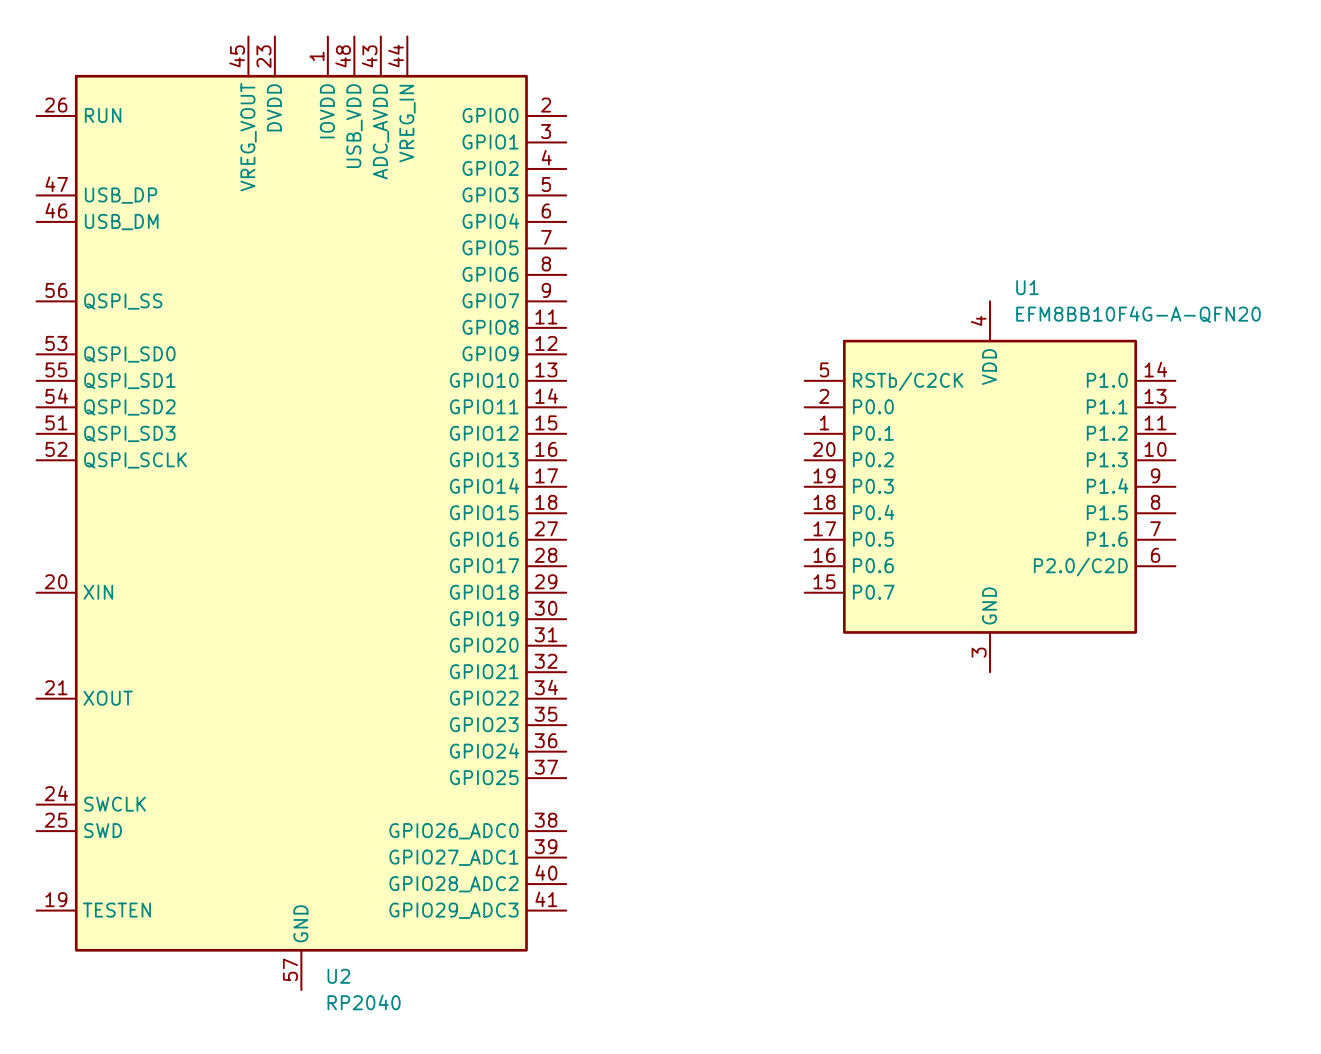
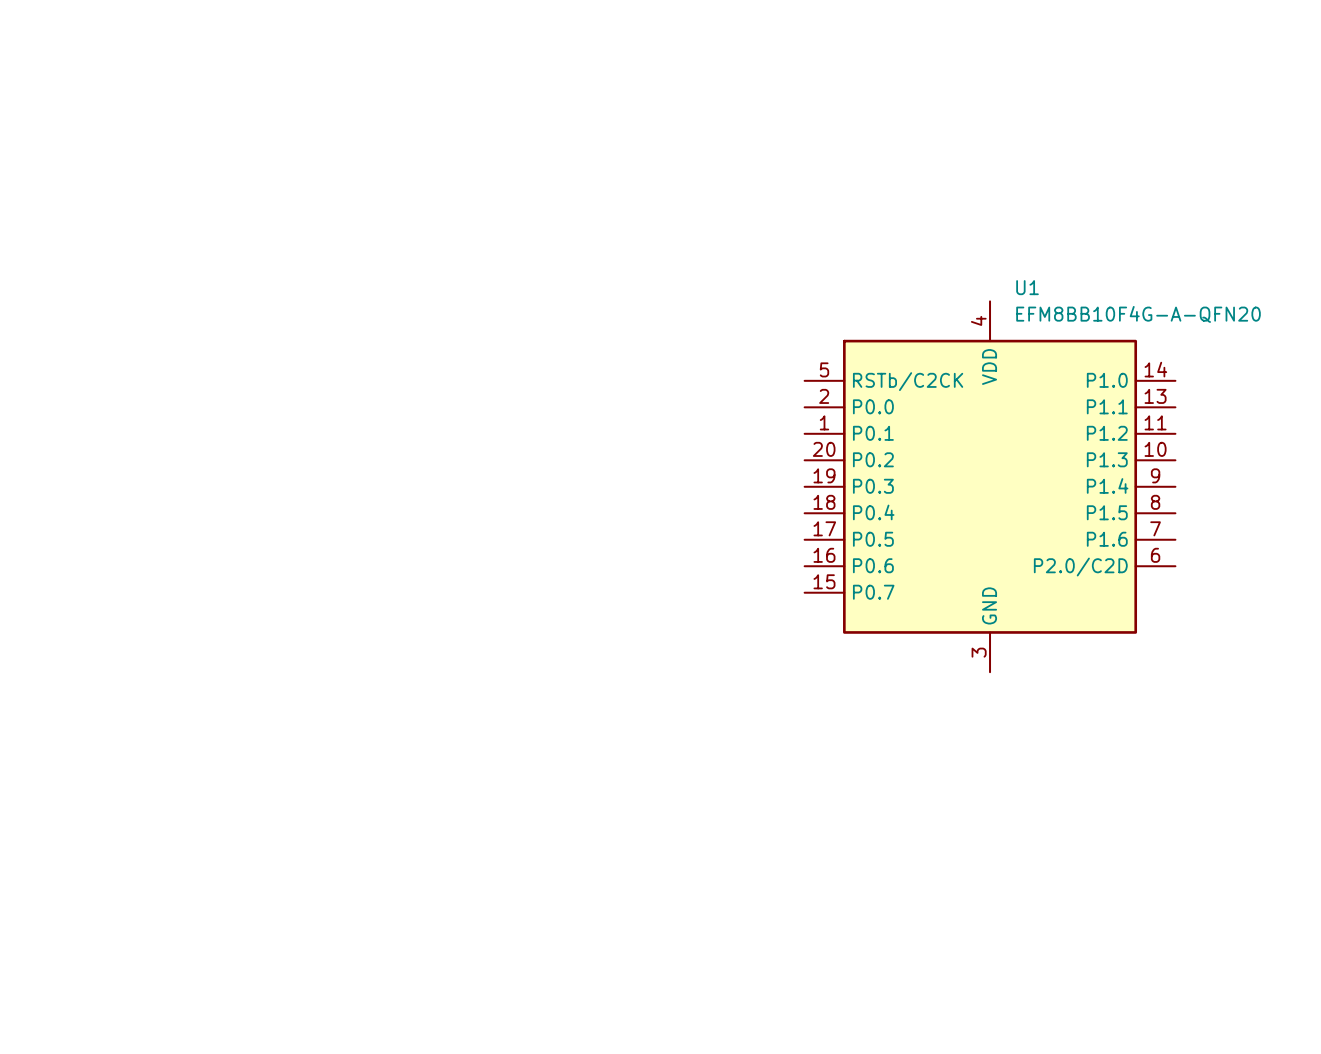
U2: RP2040 (301, 513) -> none

